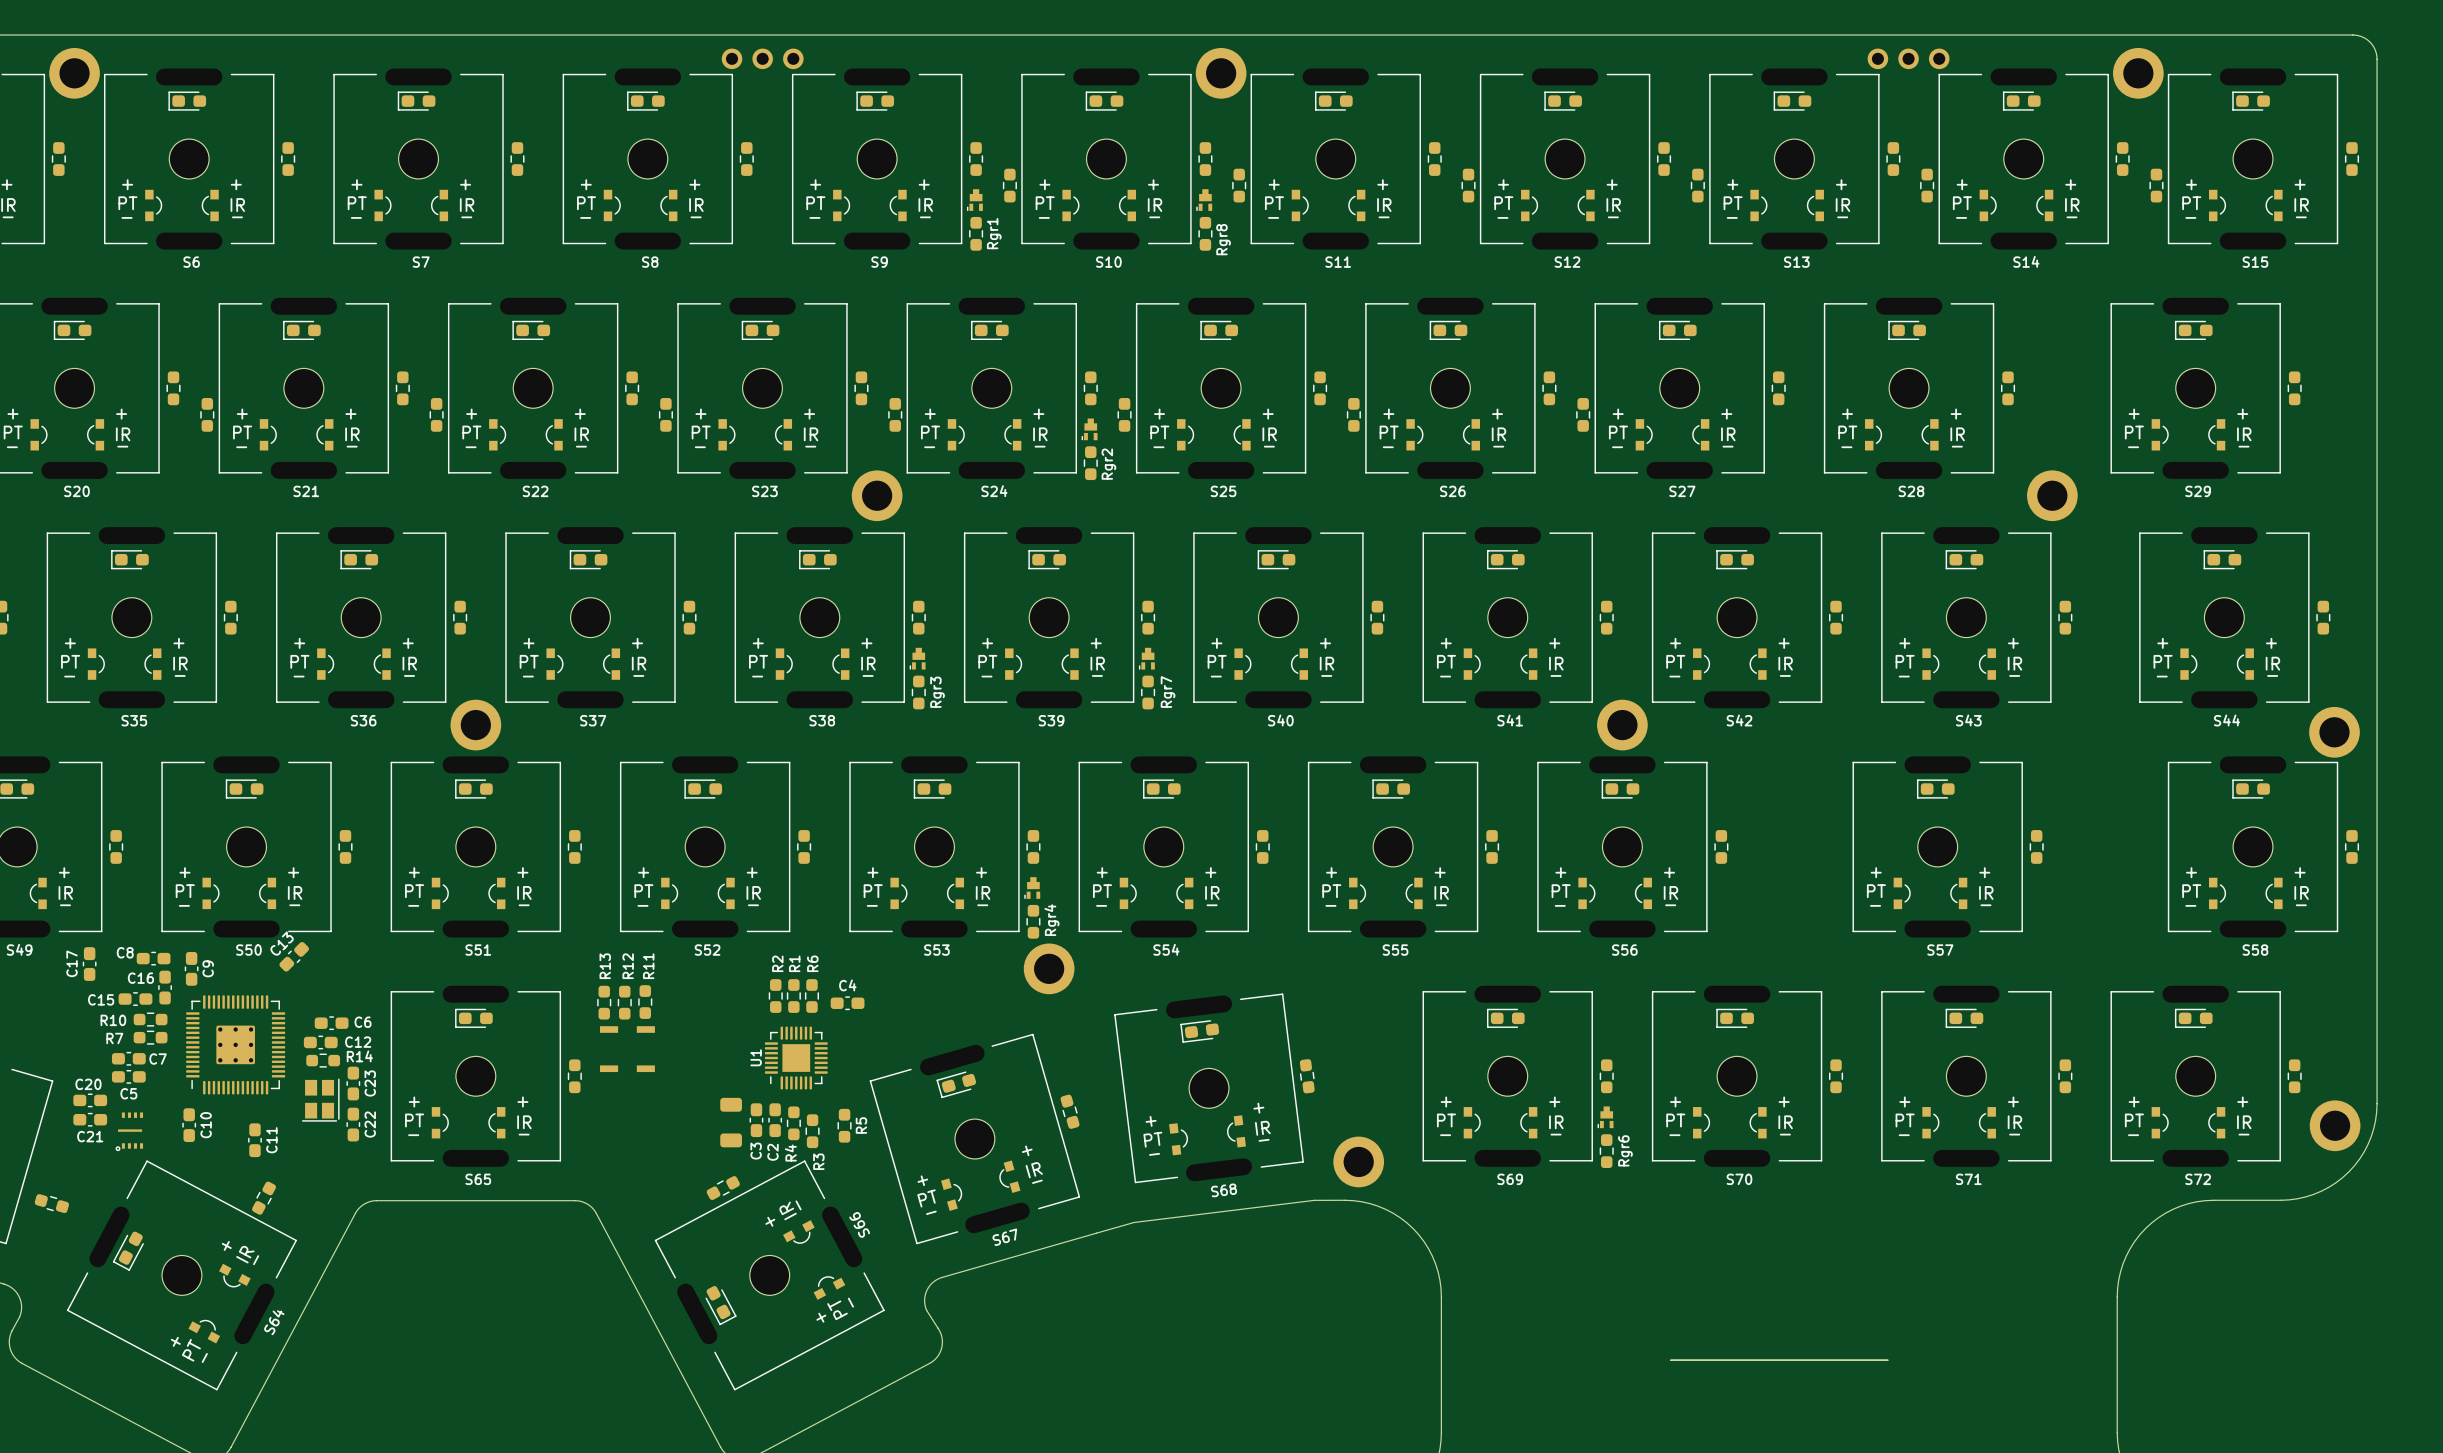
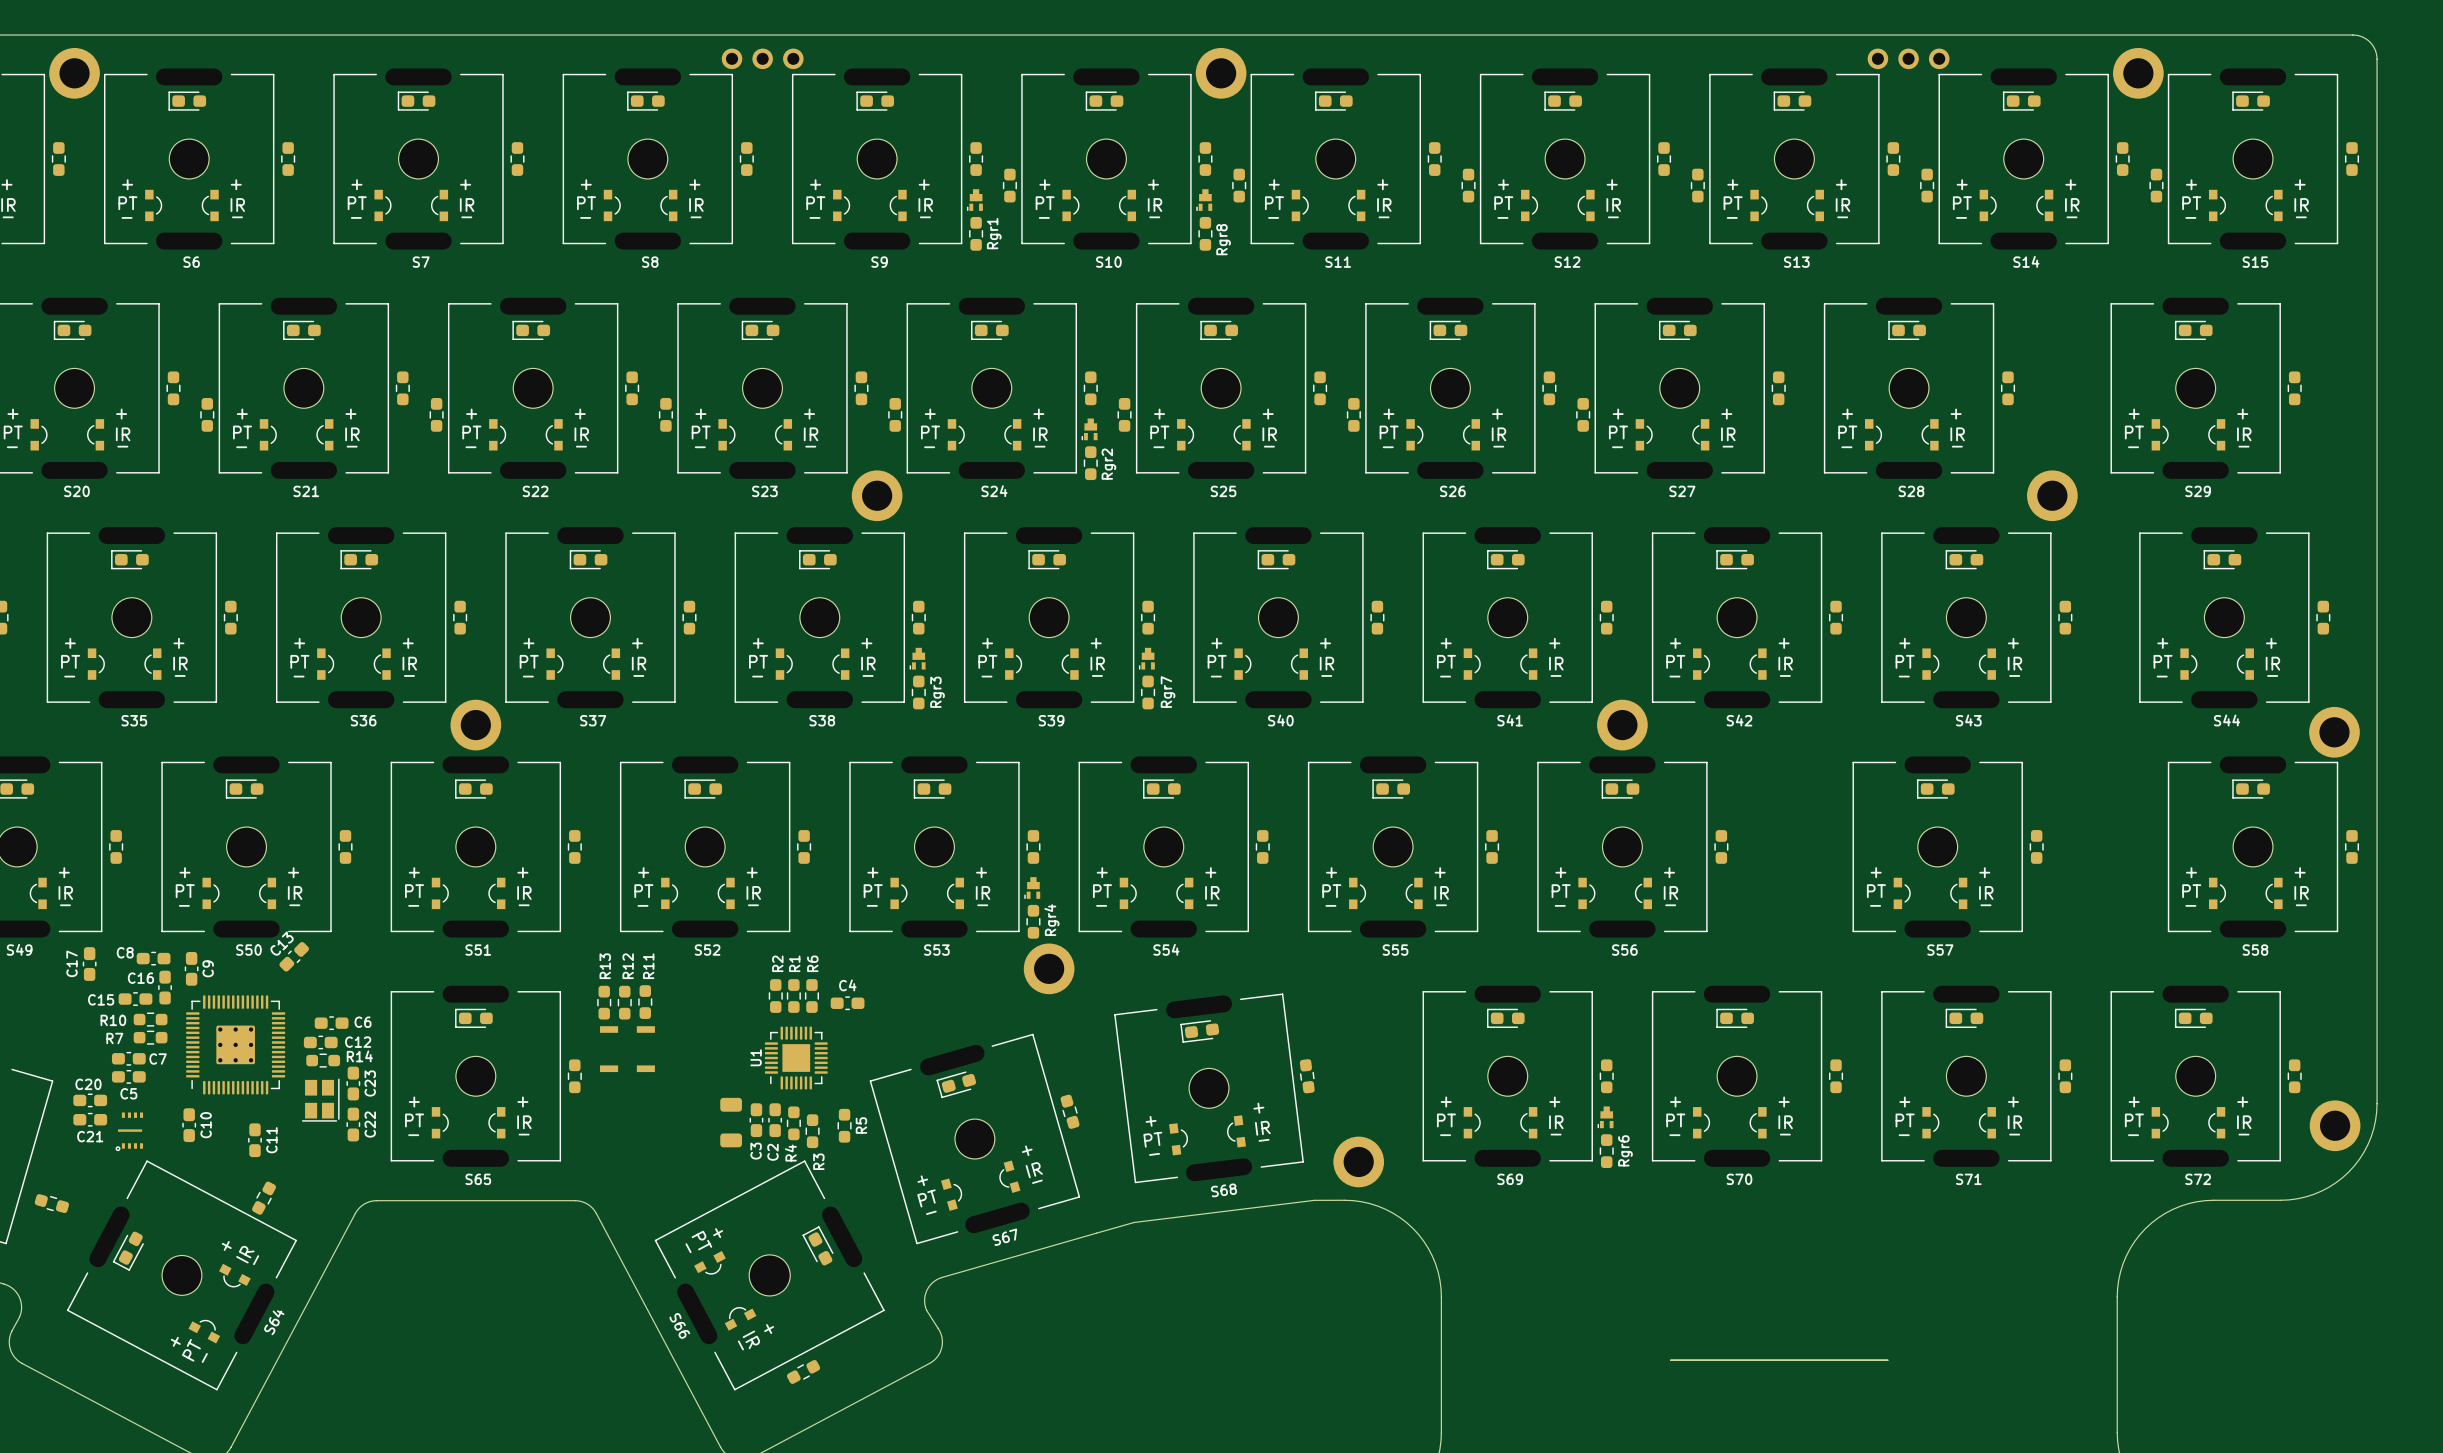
S66 footprint: [654, 1160, 885, 1391] -> [654, 1160, 885, 1391]
part position: (723, 1188) -> (803, 1371)
S66 name position: S66 (859, 1224) -> S66 (679, 1325)
part rotation: 0° (721, 1305) -> 180° (817, 1245)
part position: (721, 1305) -> (817, 1245)

